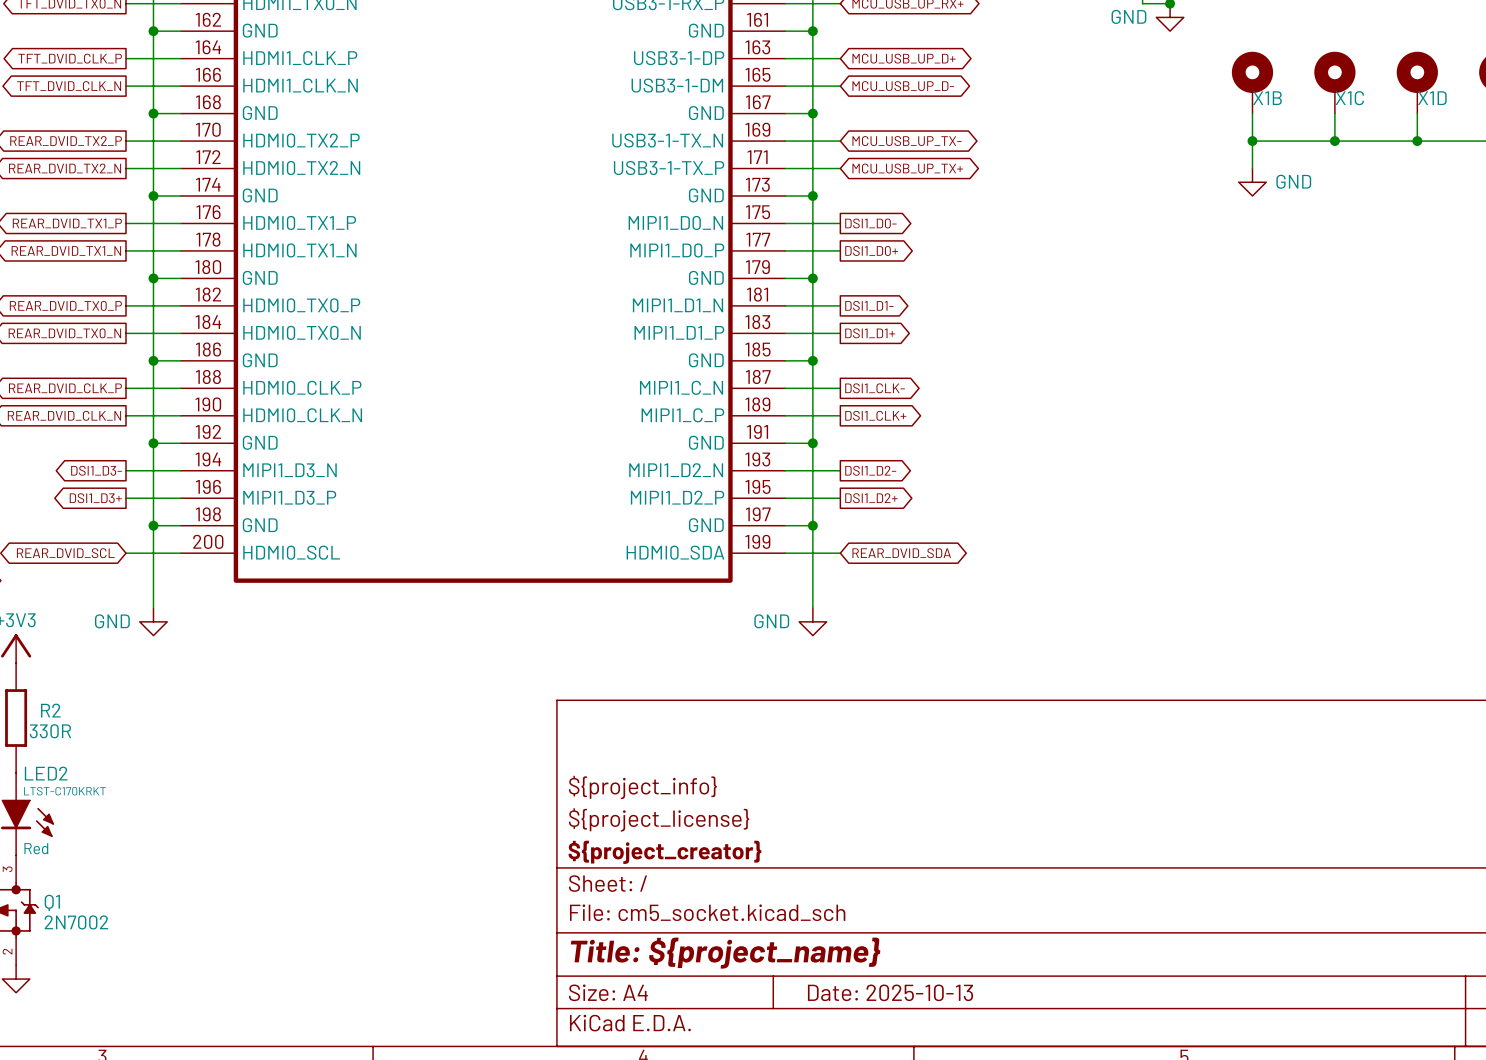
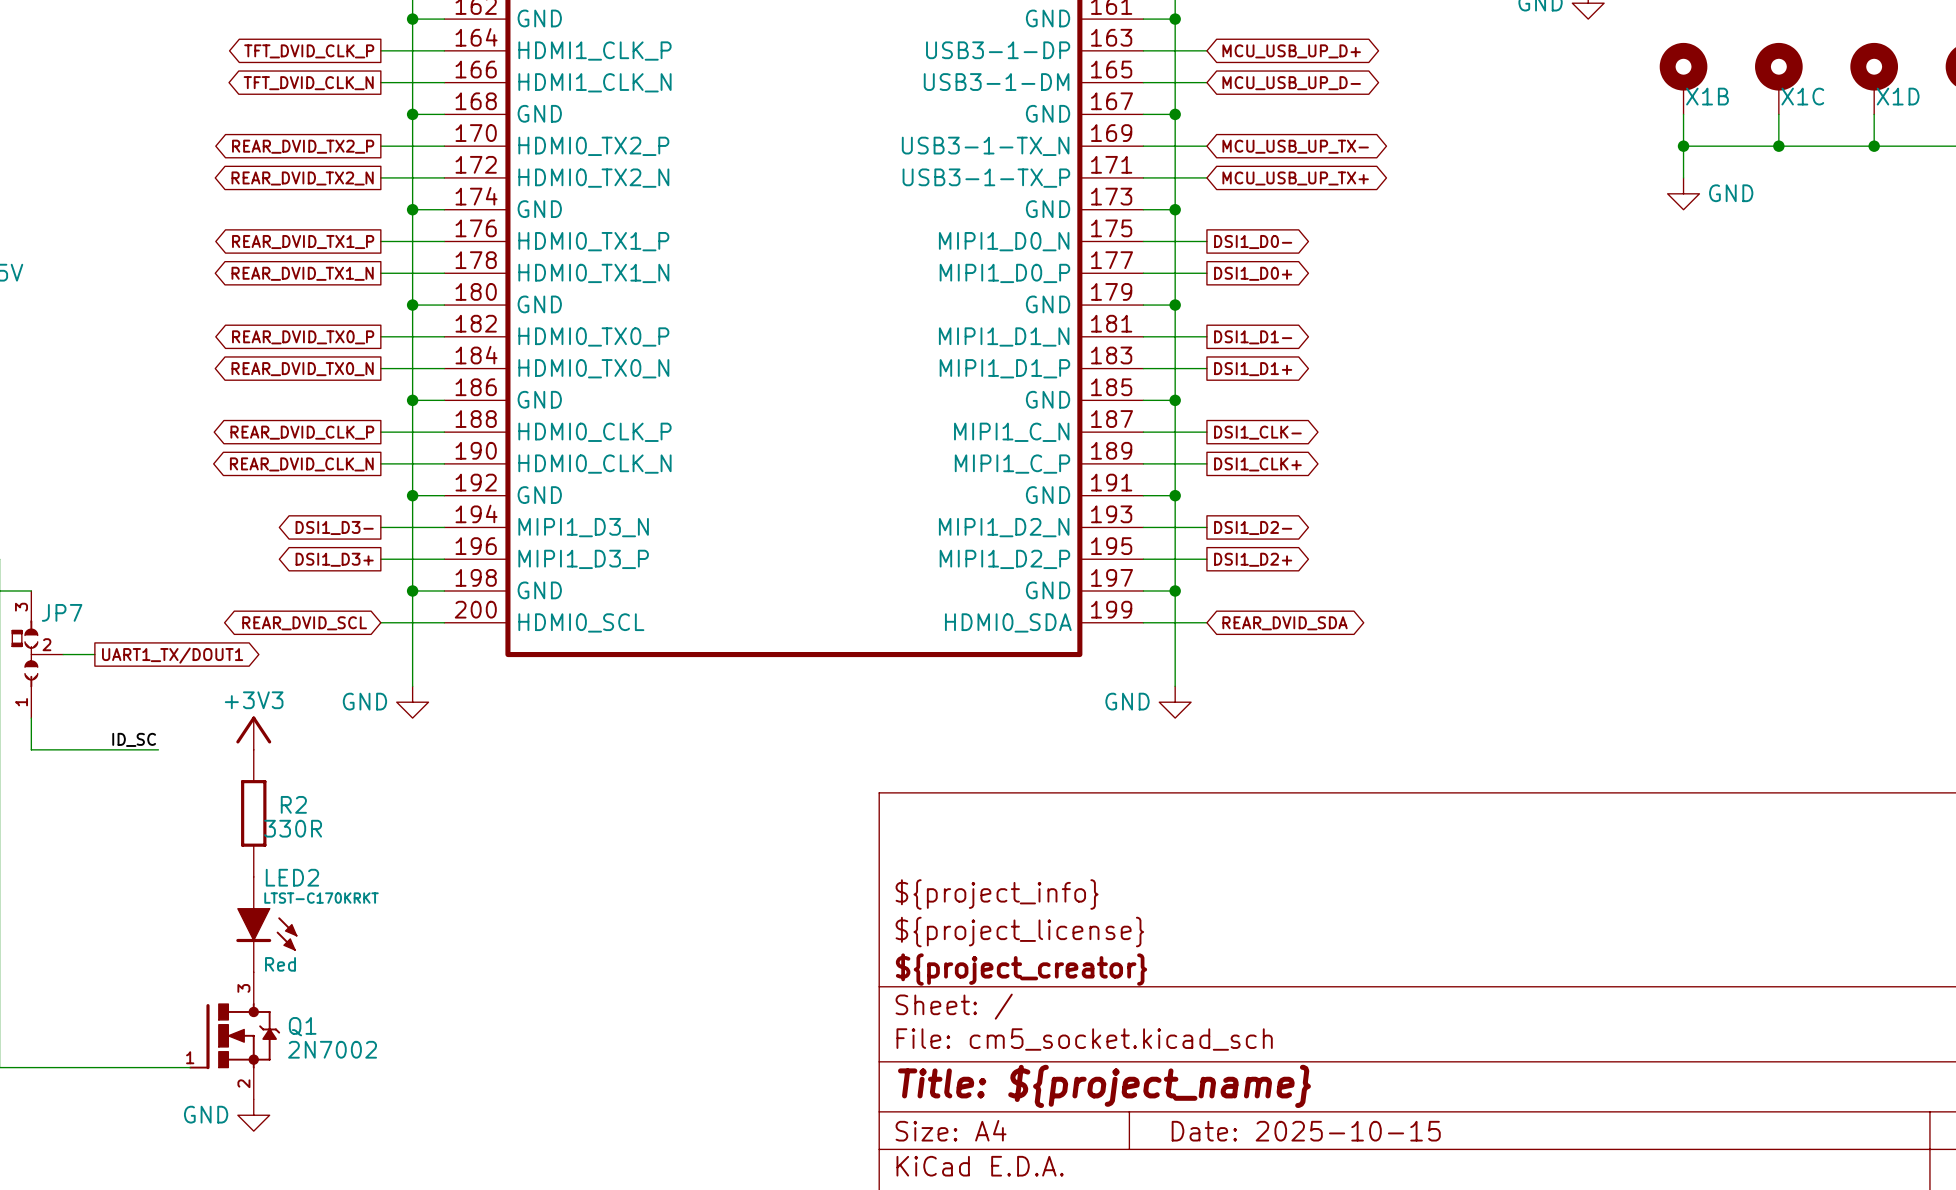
title block: Date: 2025-10-13 (890, 992) -> Date: 2025-10-15 (1306, 1131)

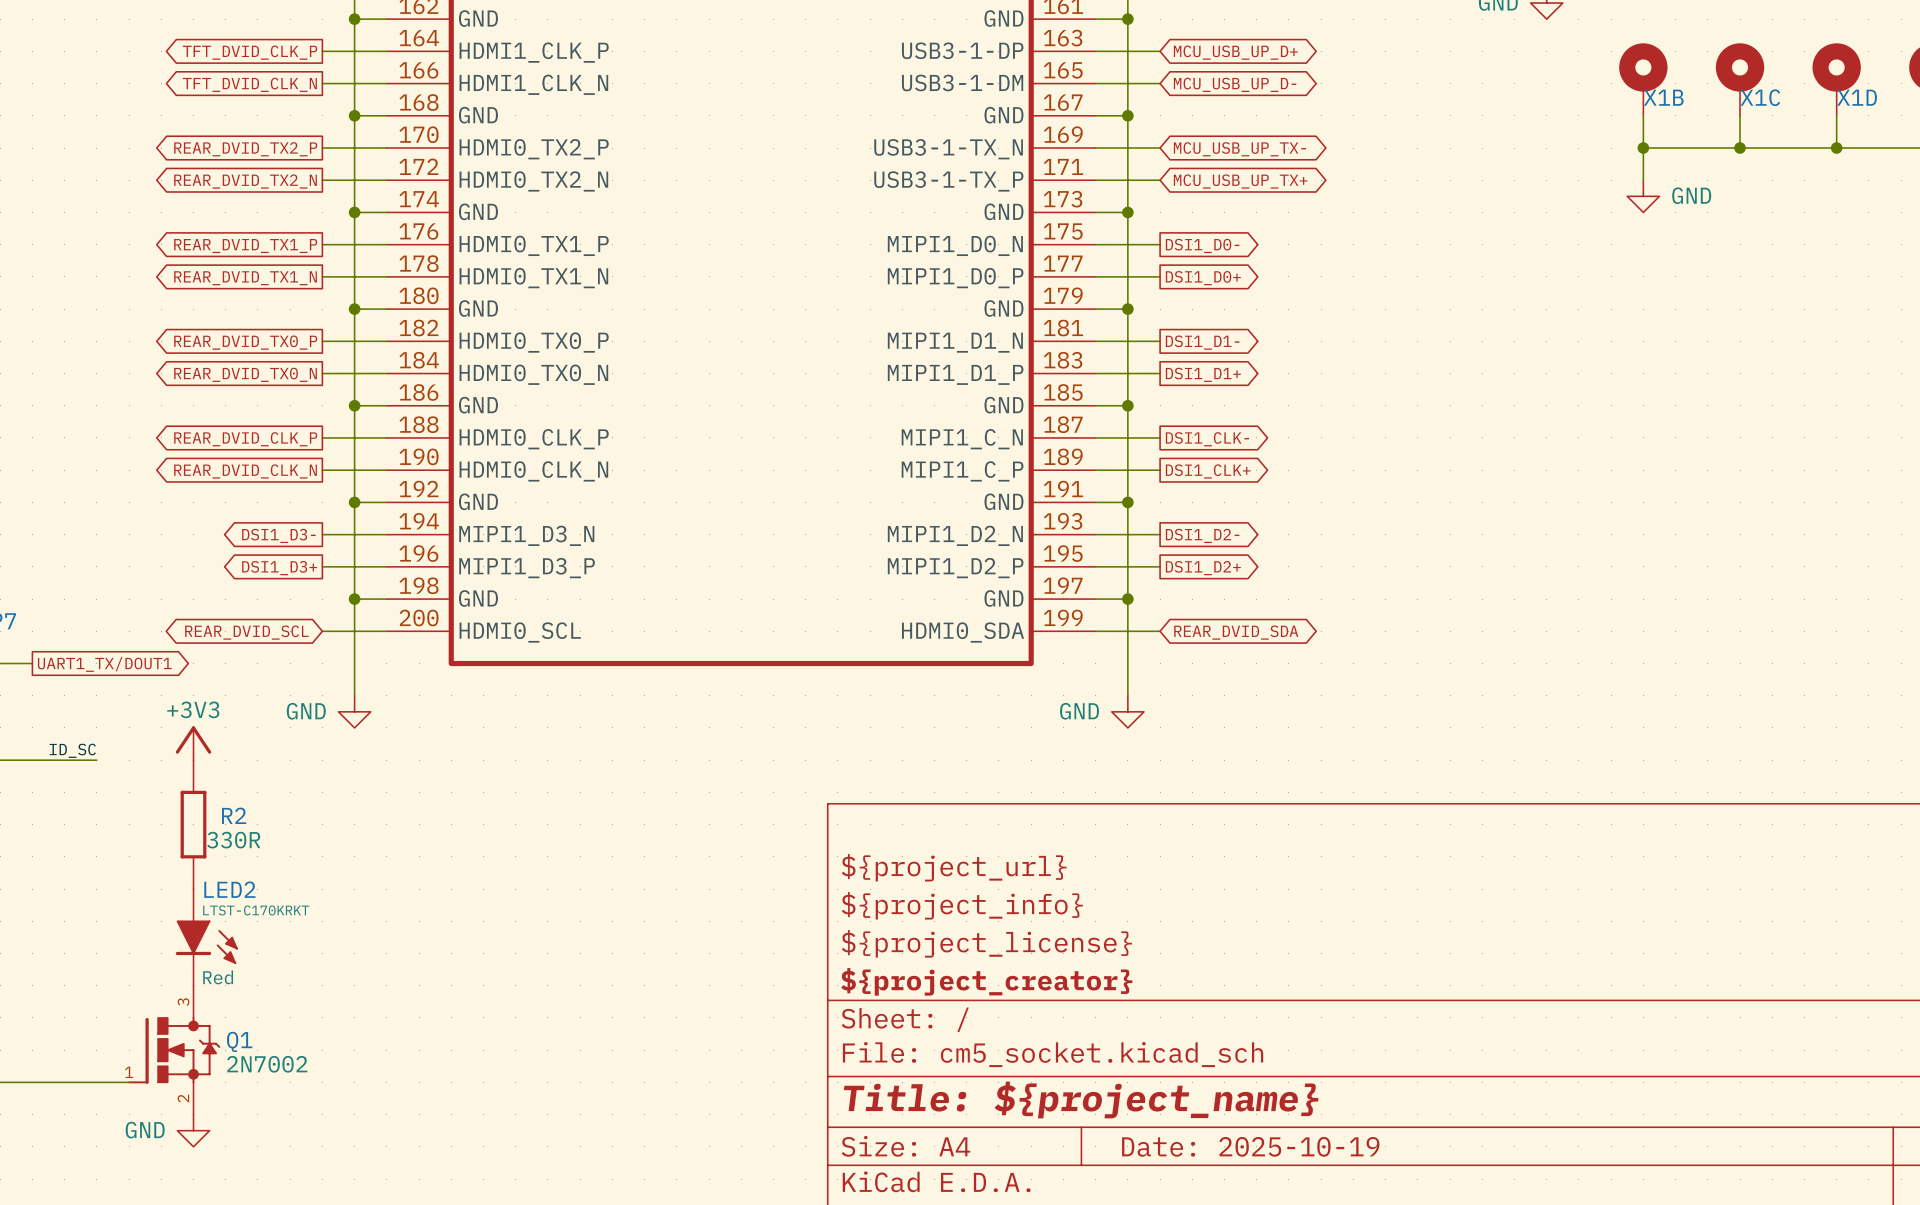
title block: none -> ${project_url} (954, 867)
title block: Date: 2025-10-15 (1306, 1131) -> Date: 2025-10-19 (1250, 1146)

